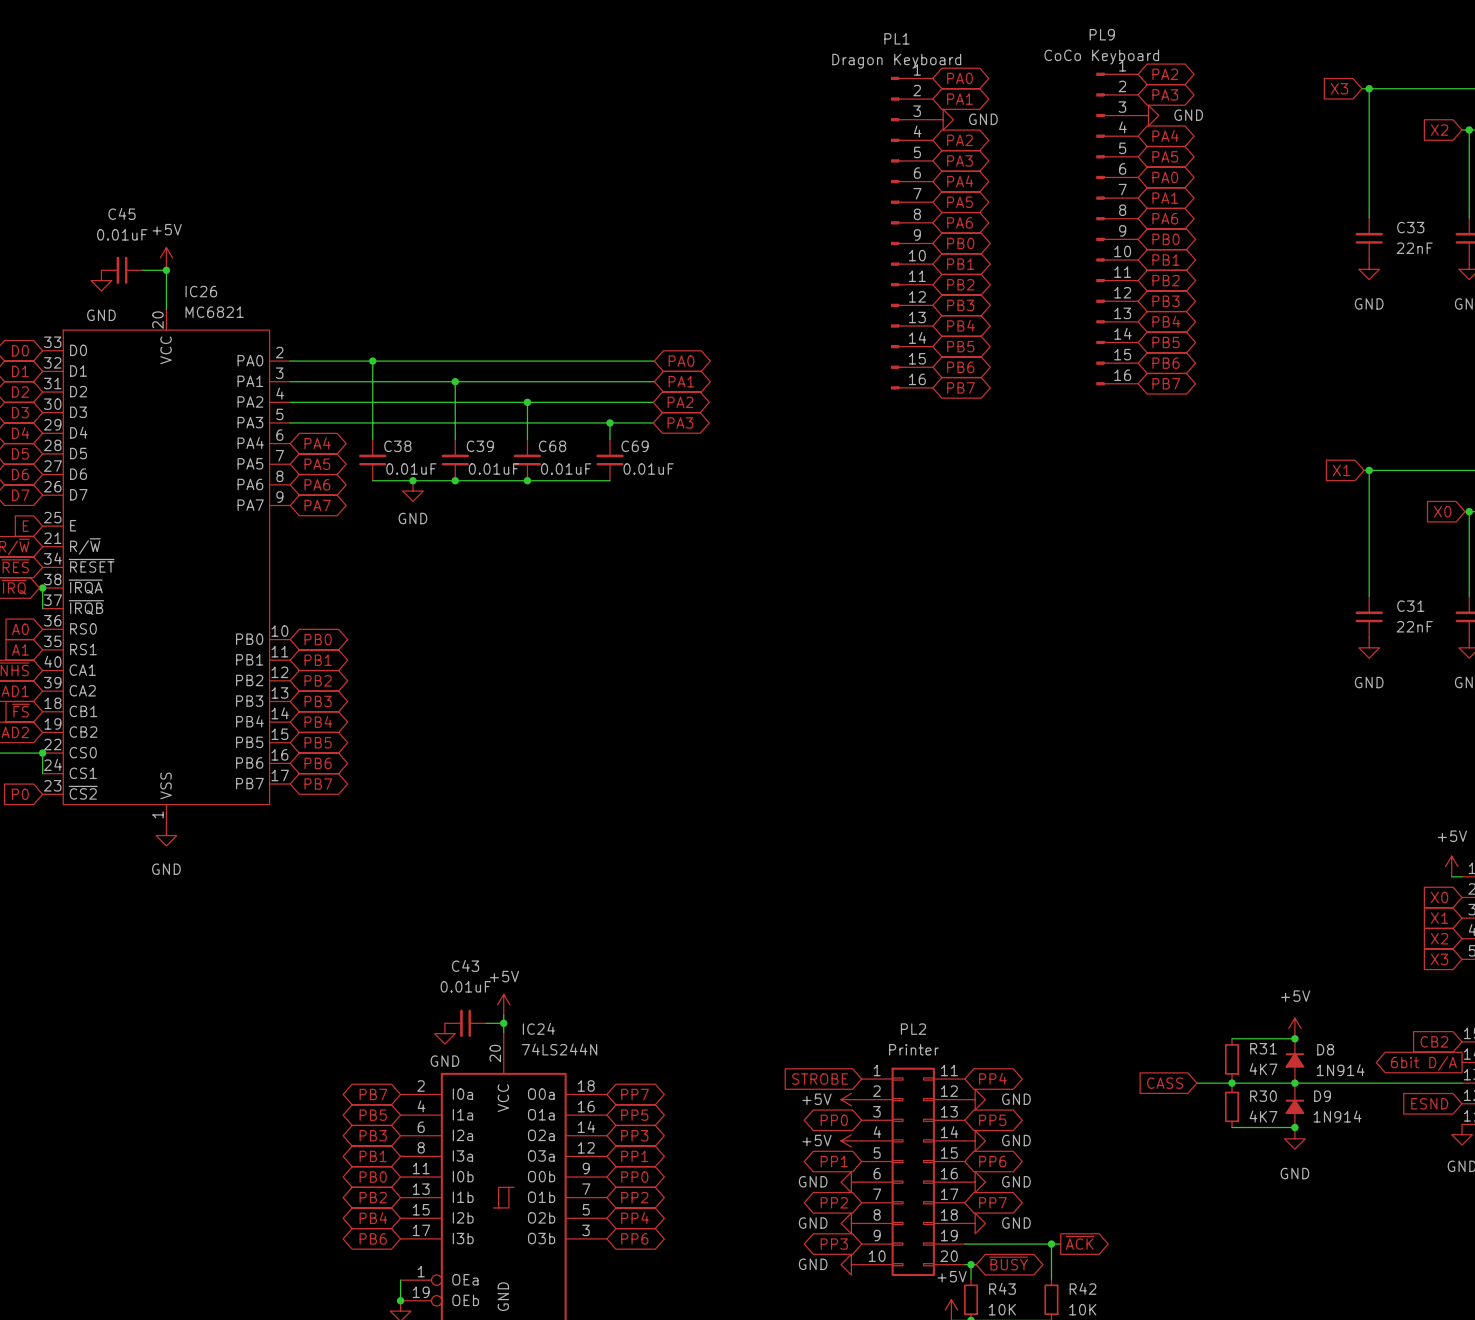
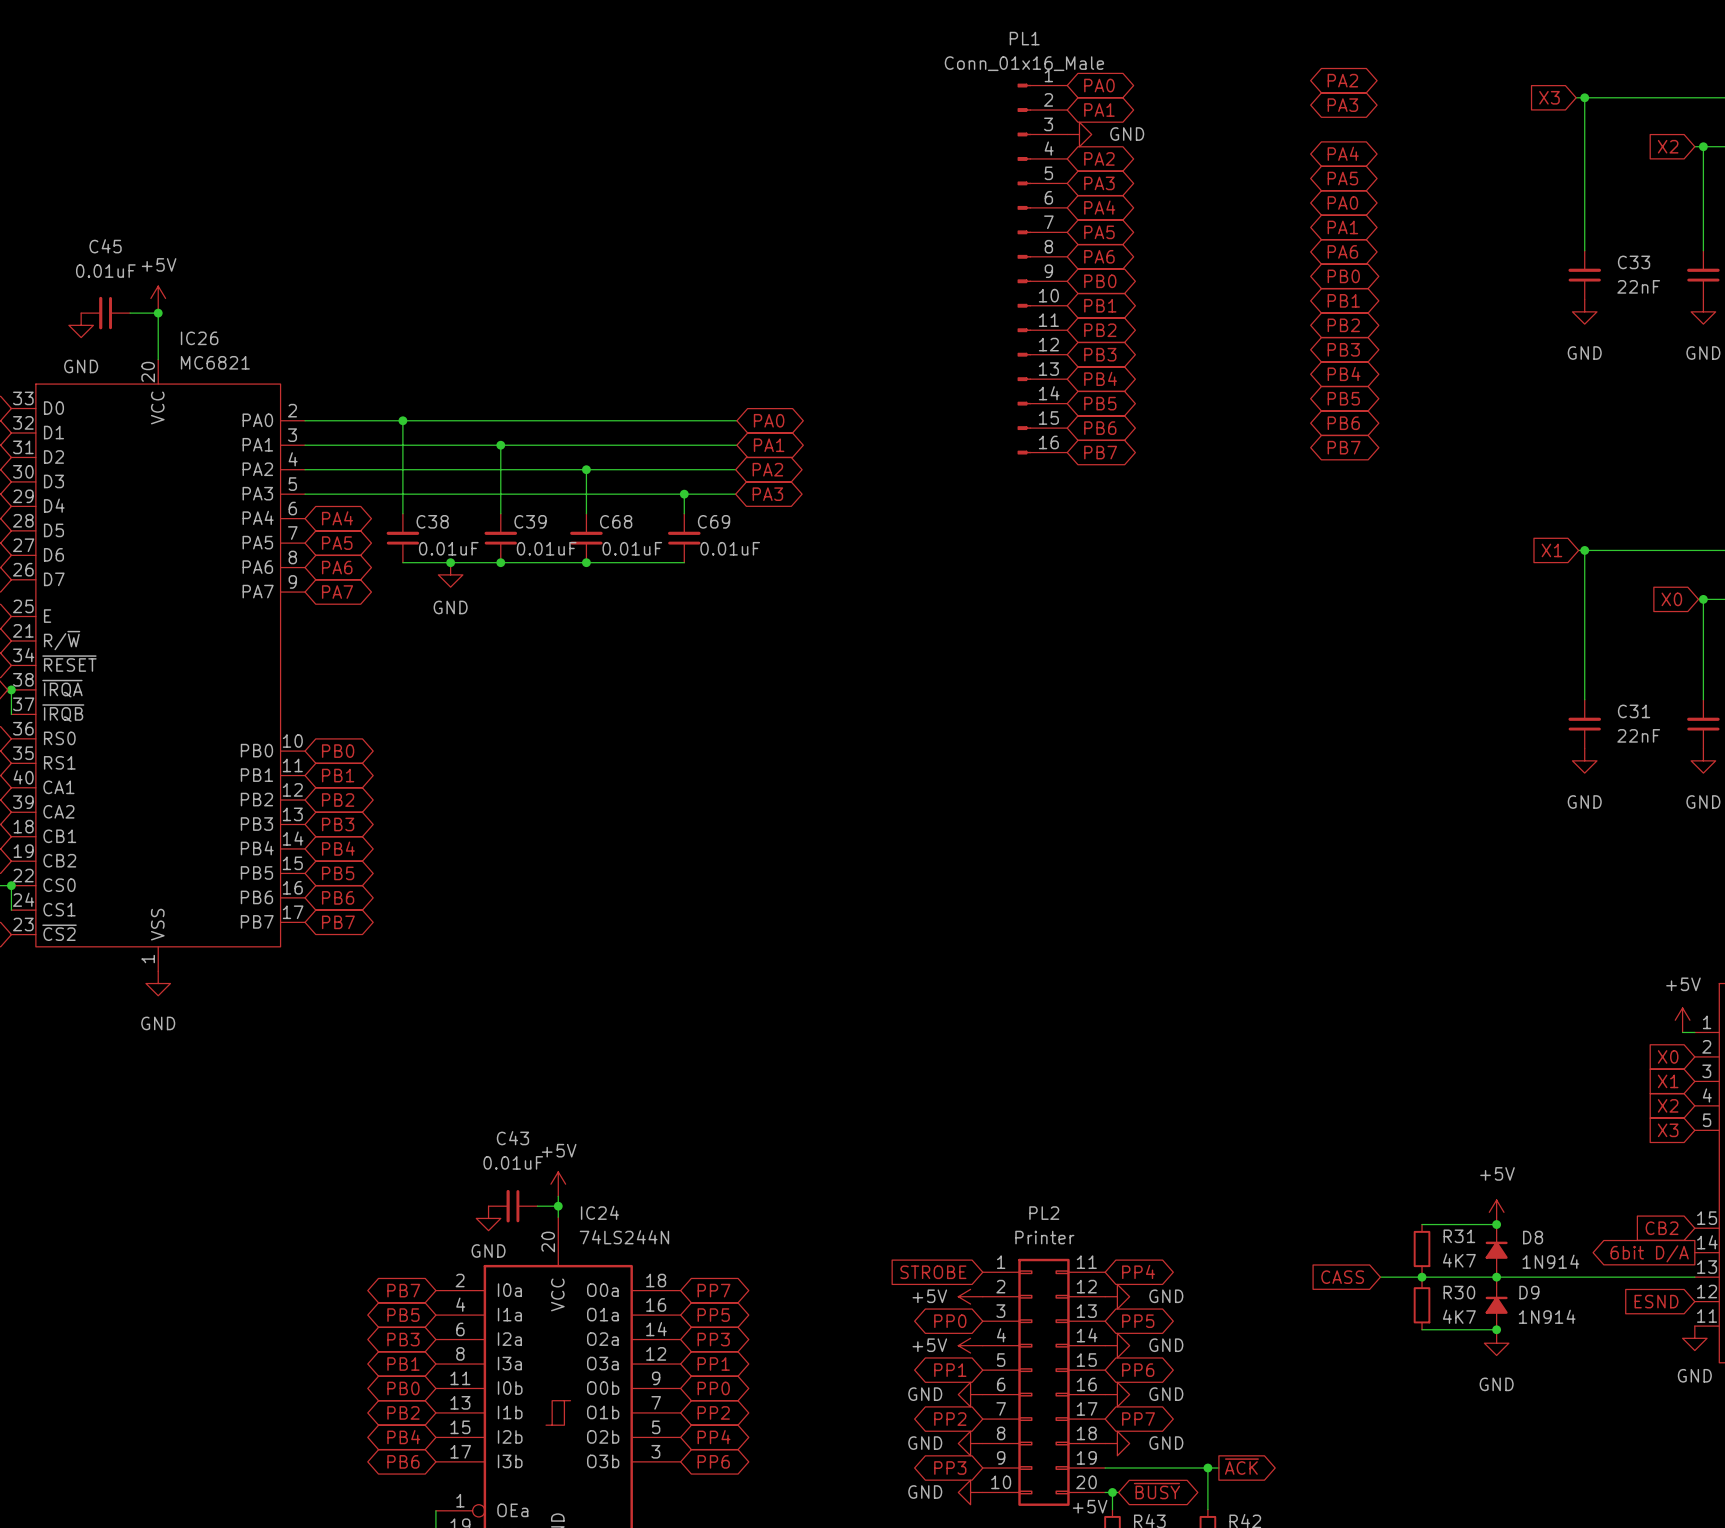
PL1 value: Dragon Keyboard (896, 61) -> Conn_01x16_Male (1024, 63)
power symbol: GND (1148, 115) -> none
PL9: CoCo Keyboard (1117, 229) -> none

